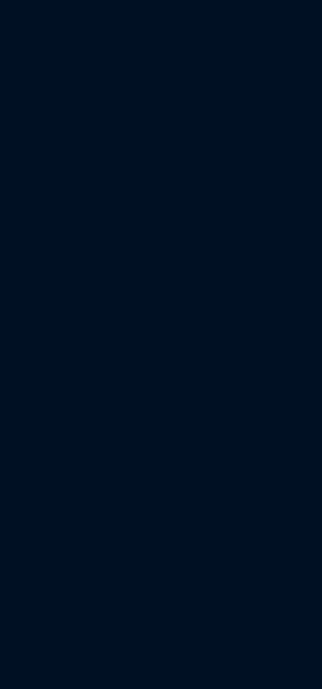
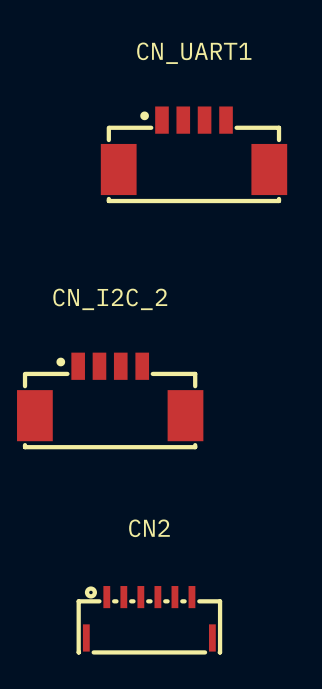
CN_UART1: none -> (194, 154)
CN_I2C_2: none -> (110, 400)
CN2: none -> (149, 620)

